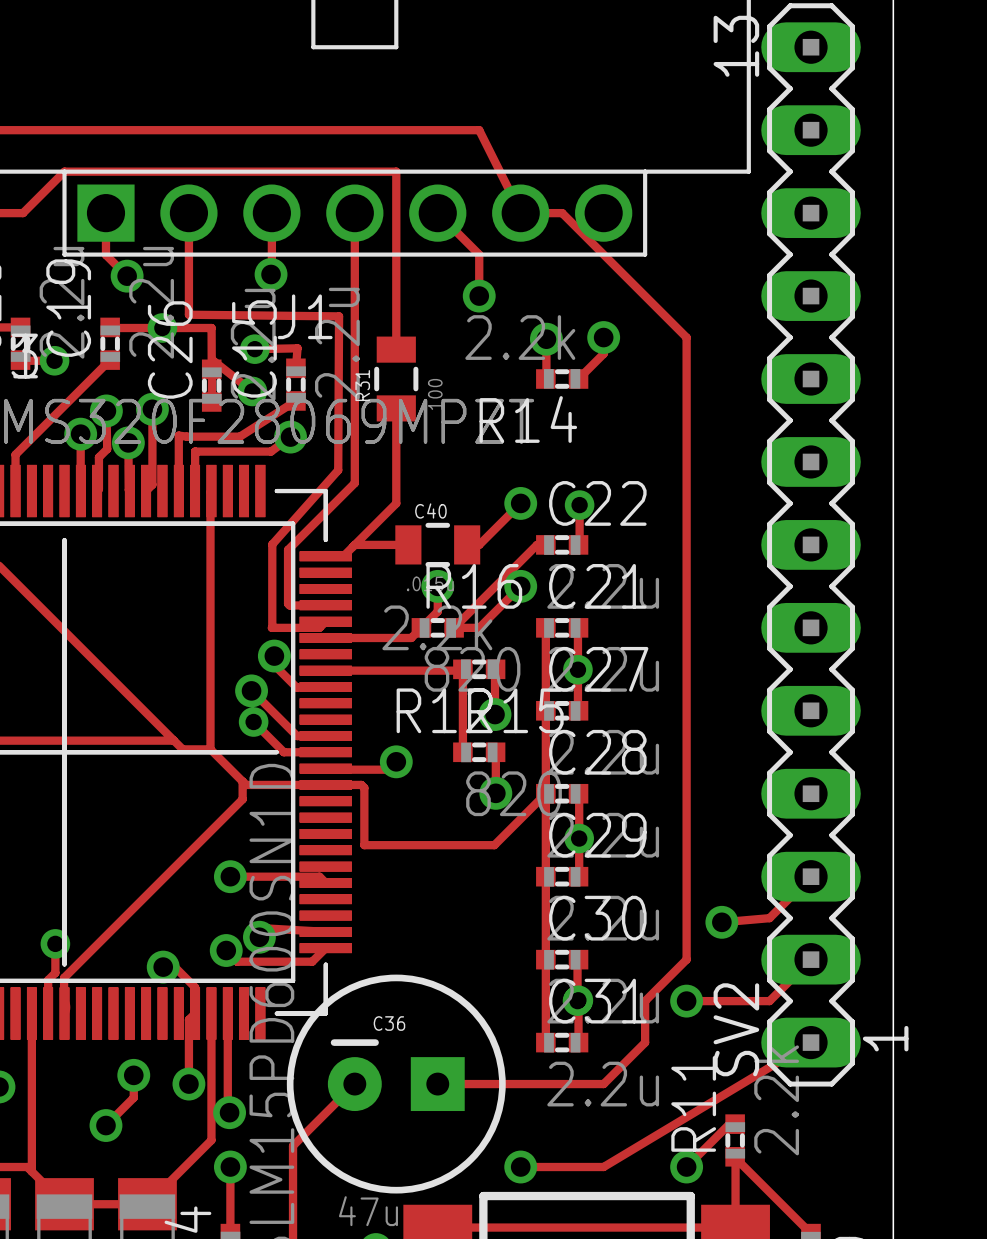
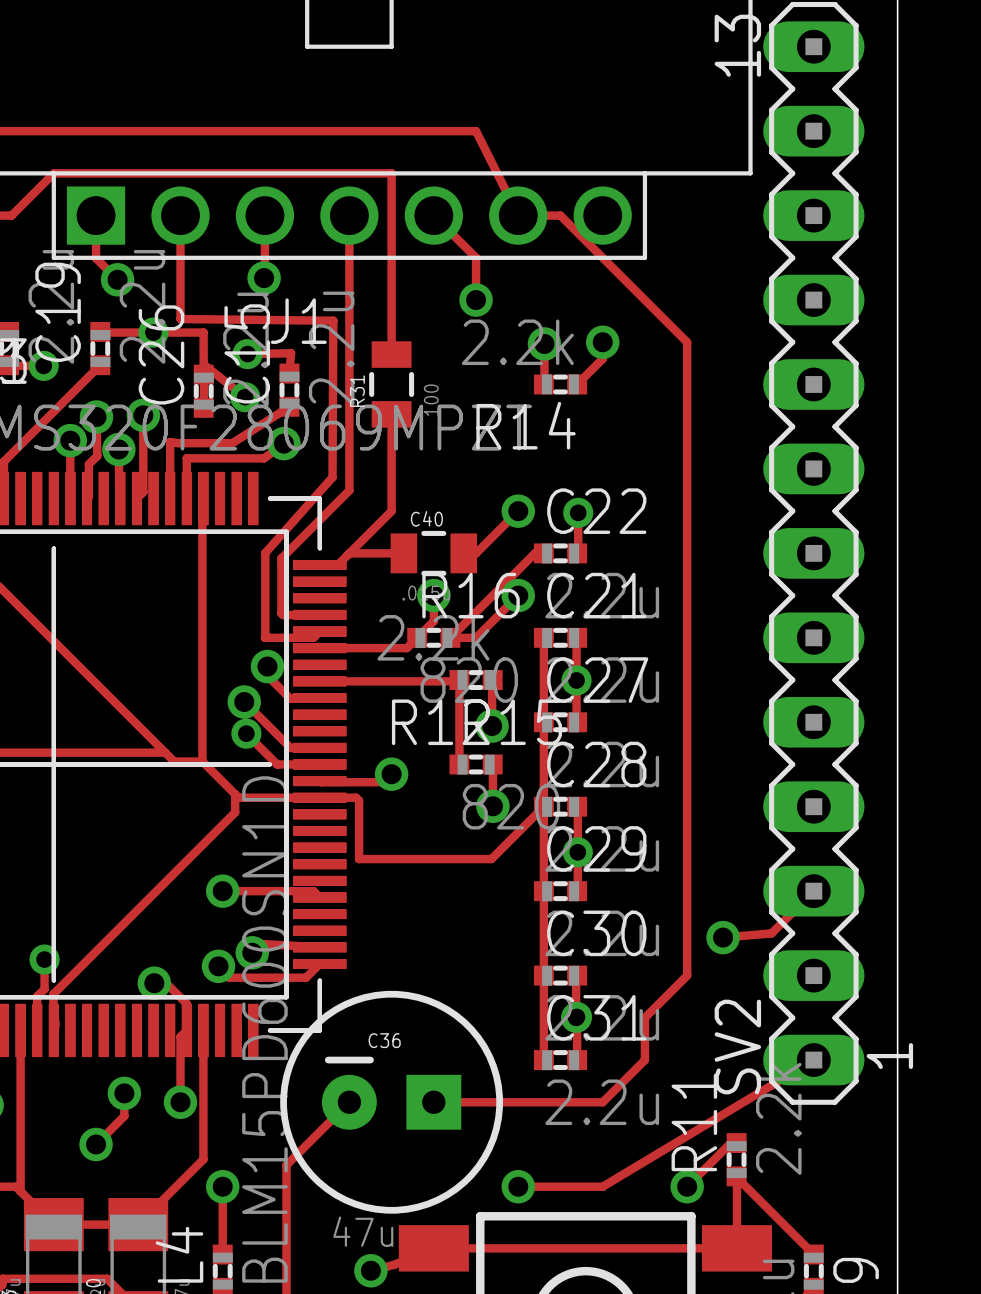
top track: (811, 959) (769, 1001) (686, 1001) -> none
via: (686, 1001) -> none
top track: (227, 1013) (227, 1110) (229, 1112) -> none
via: (229, 1112) -> none

